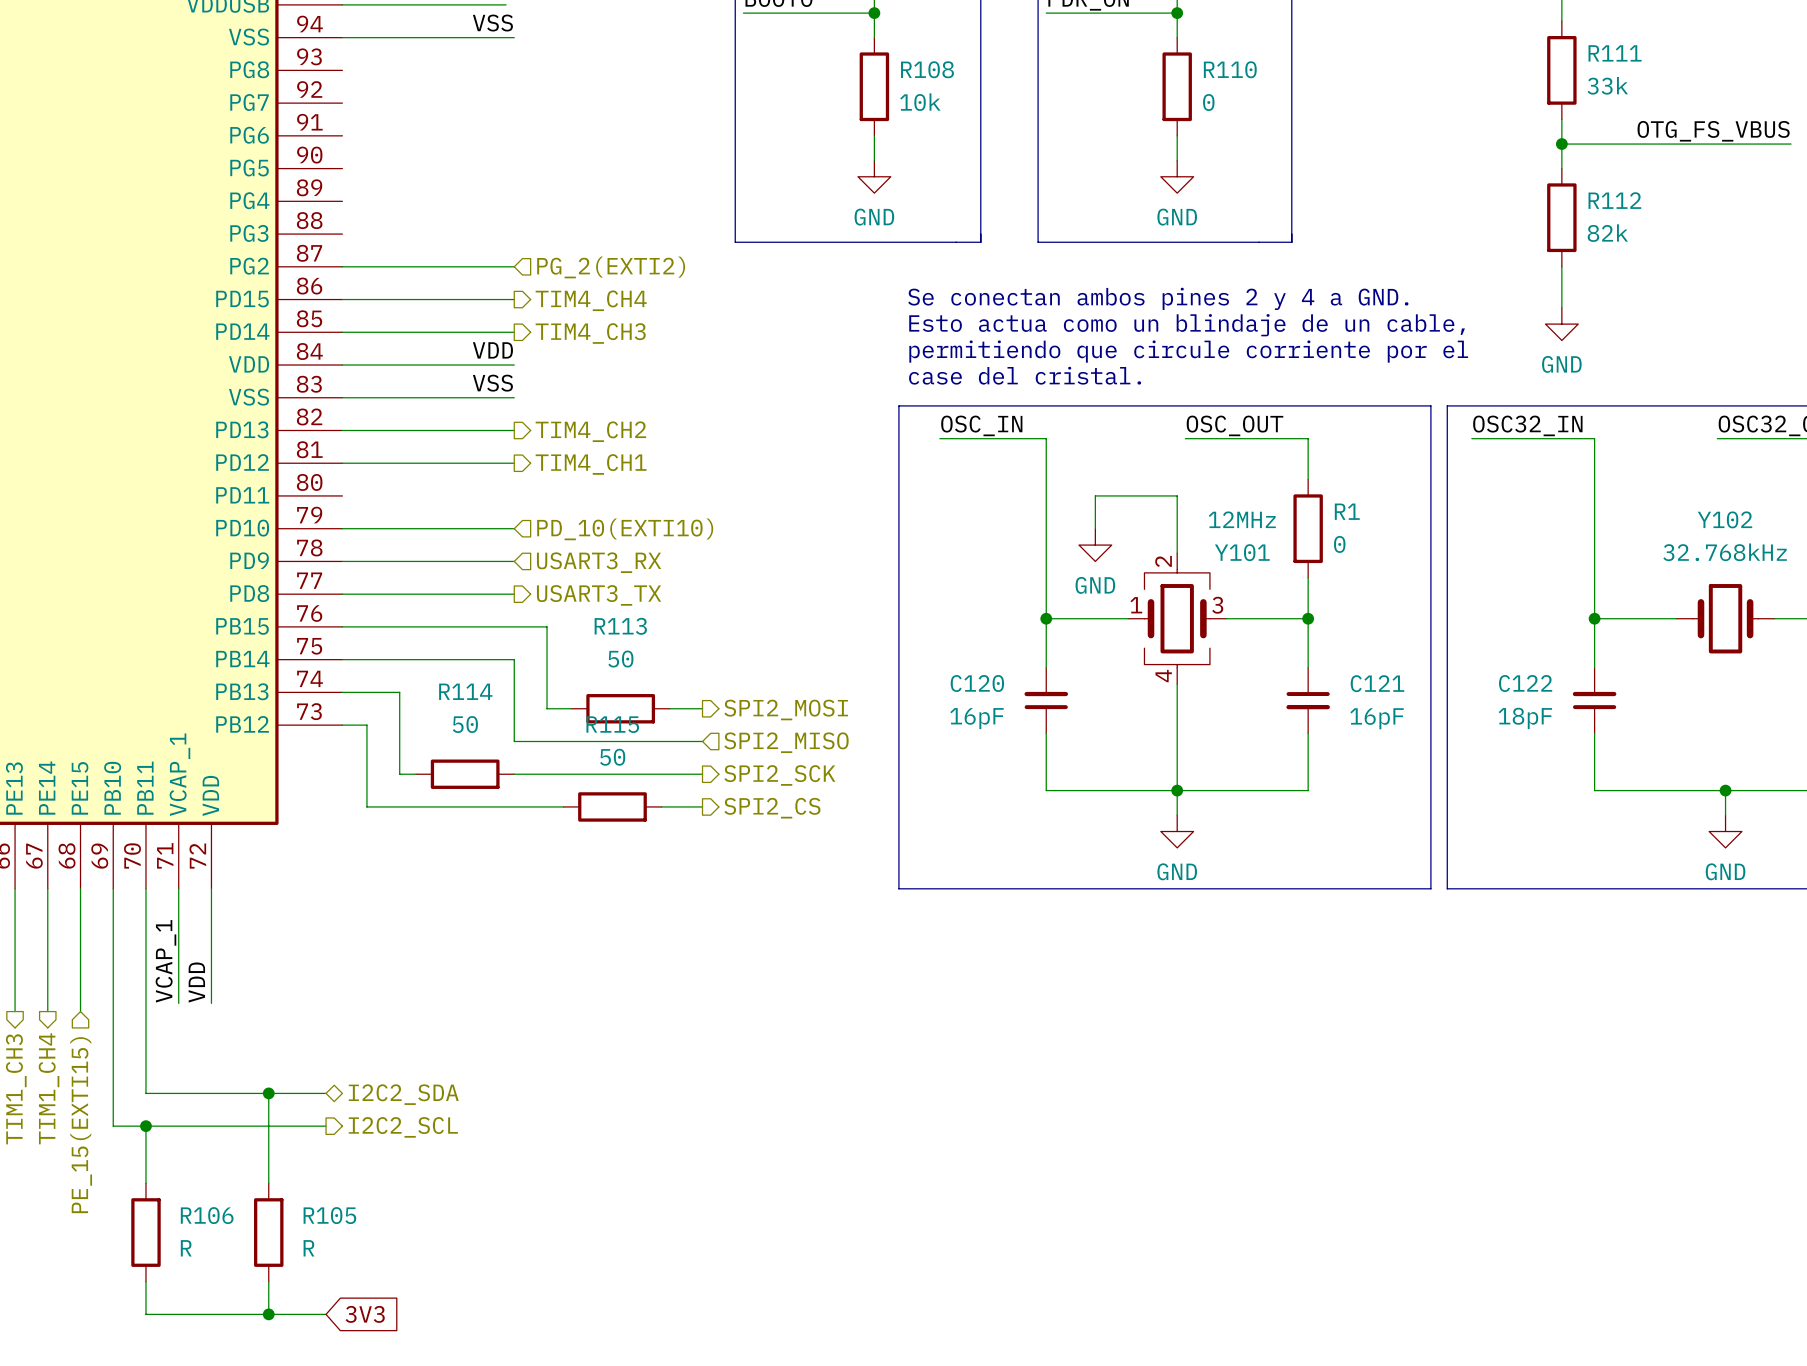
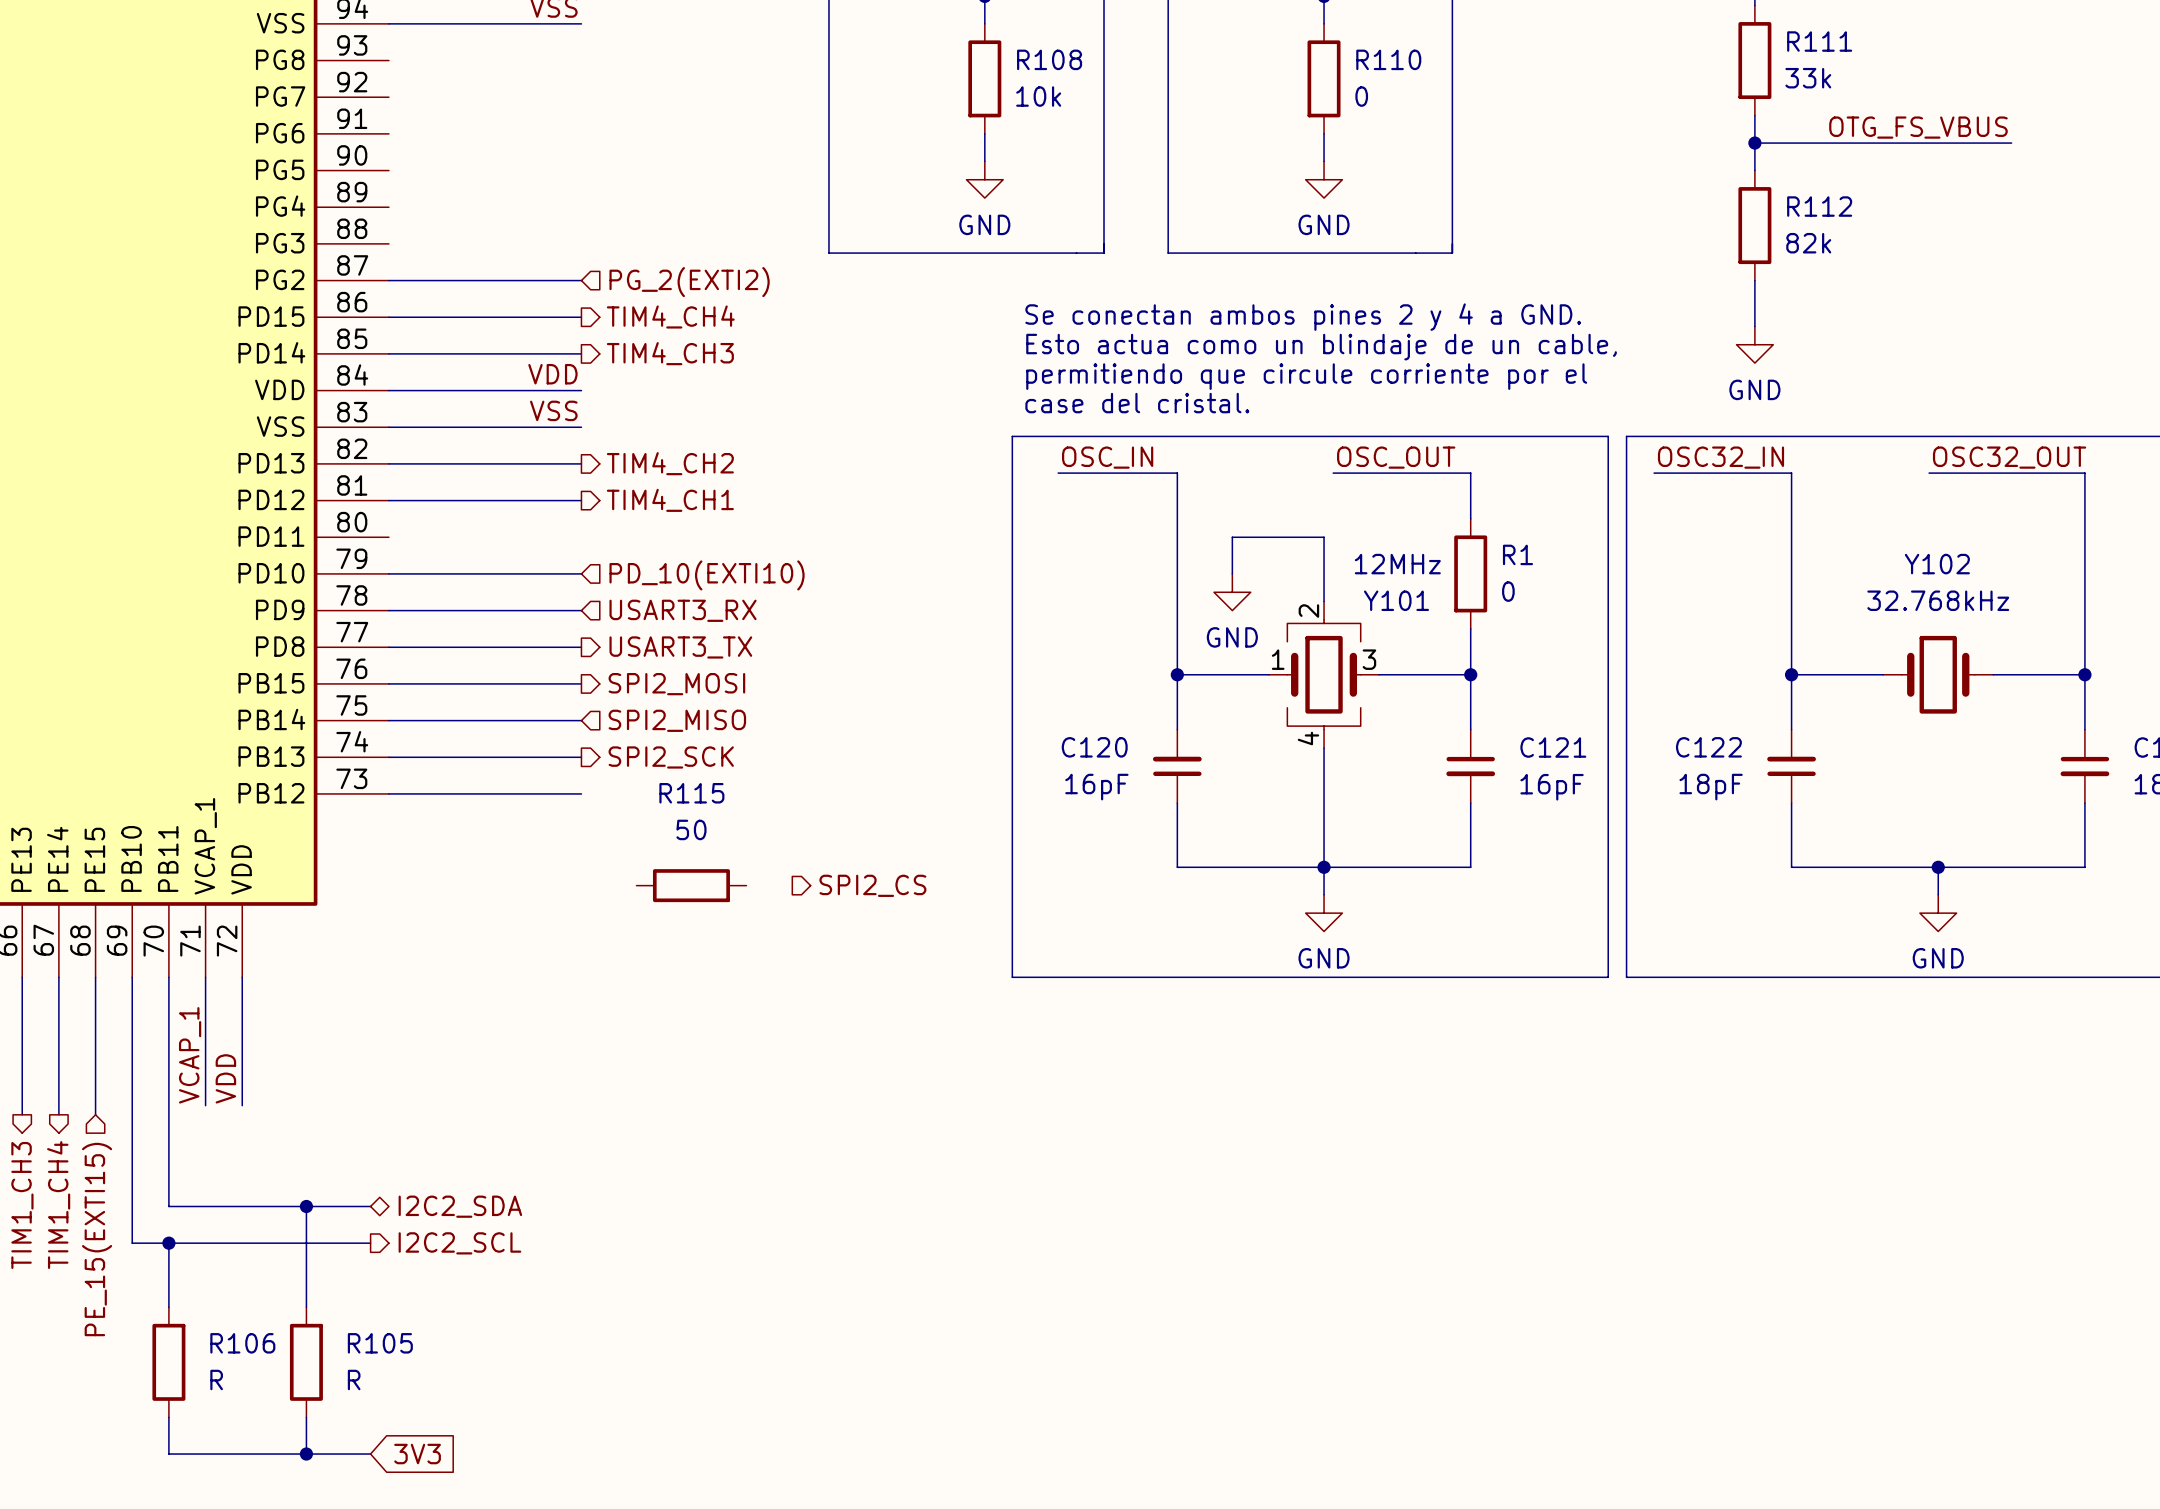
wire: (514, 626) (547, 626) (547, 708) (571, 708) -> none
wire: (514, 659) (514, 741) (702, 741) -> none
wire: (399, 692) (399, 774) (416, 774) -> (453, 757) (581, 757)
R113: 50 (620, 708) -> none
wire: (669, 708) (702, 708) -> none
hierarchical label position: SPI2_MOSI (786, 709) -> SPI2_MOSI (676, 684)
wire: (366, 725) (366, 806) (563, 806) -> (416, 793) (581, 793)
hierarchical label position: SPI2_MISO (786, 742) -> SPI2_MISO (677, 720)
R114: 50 (465, 774) -> none
wire: (514, 774) (702, 774) -> none
hierarchical label position: SPI2_SCK (779, 775) -> SPI2_SCK (671, 757)
wire: (661, 806) (702, 806) -> none

